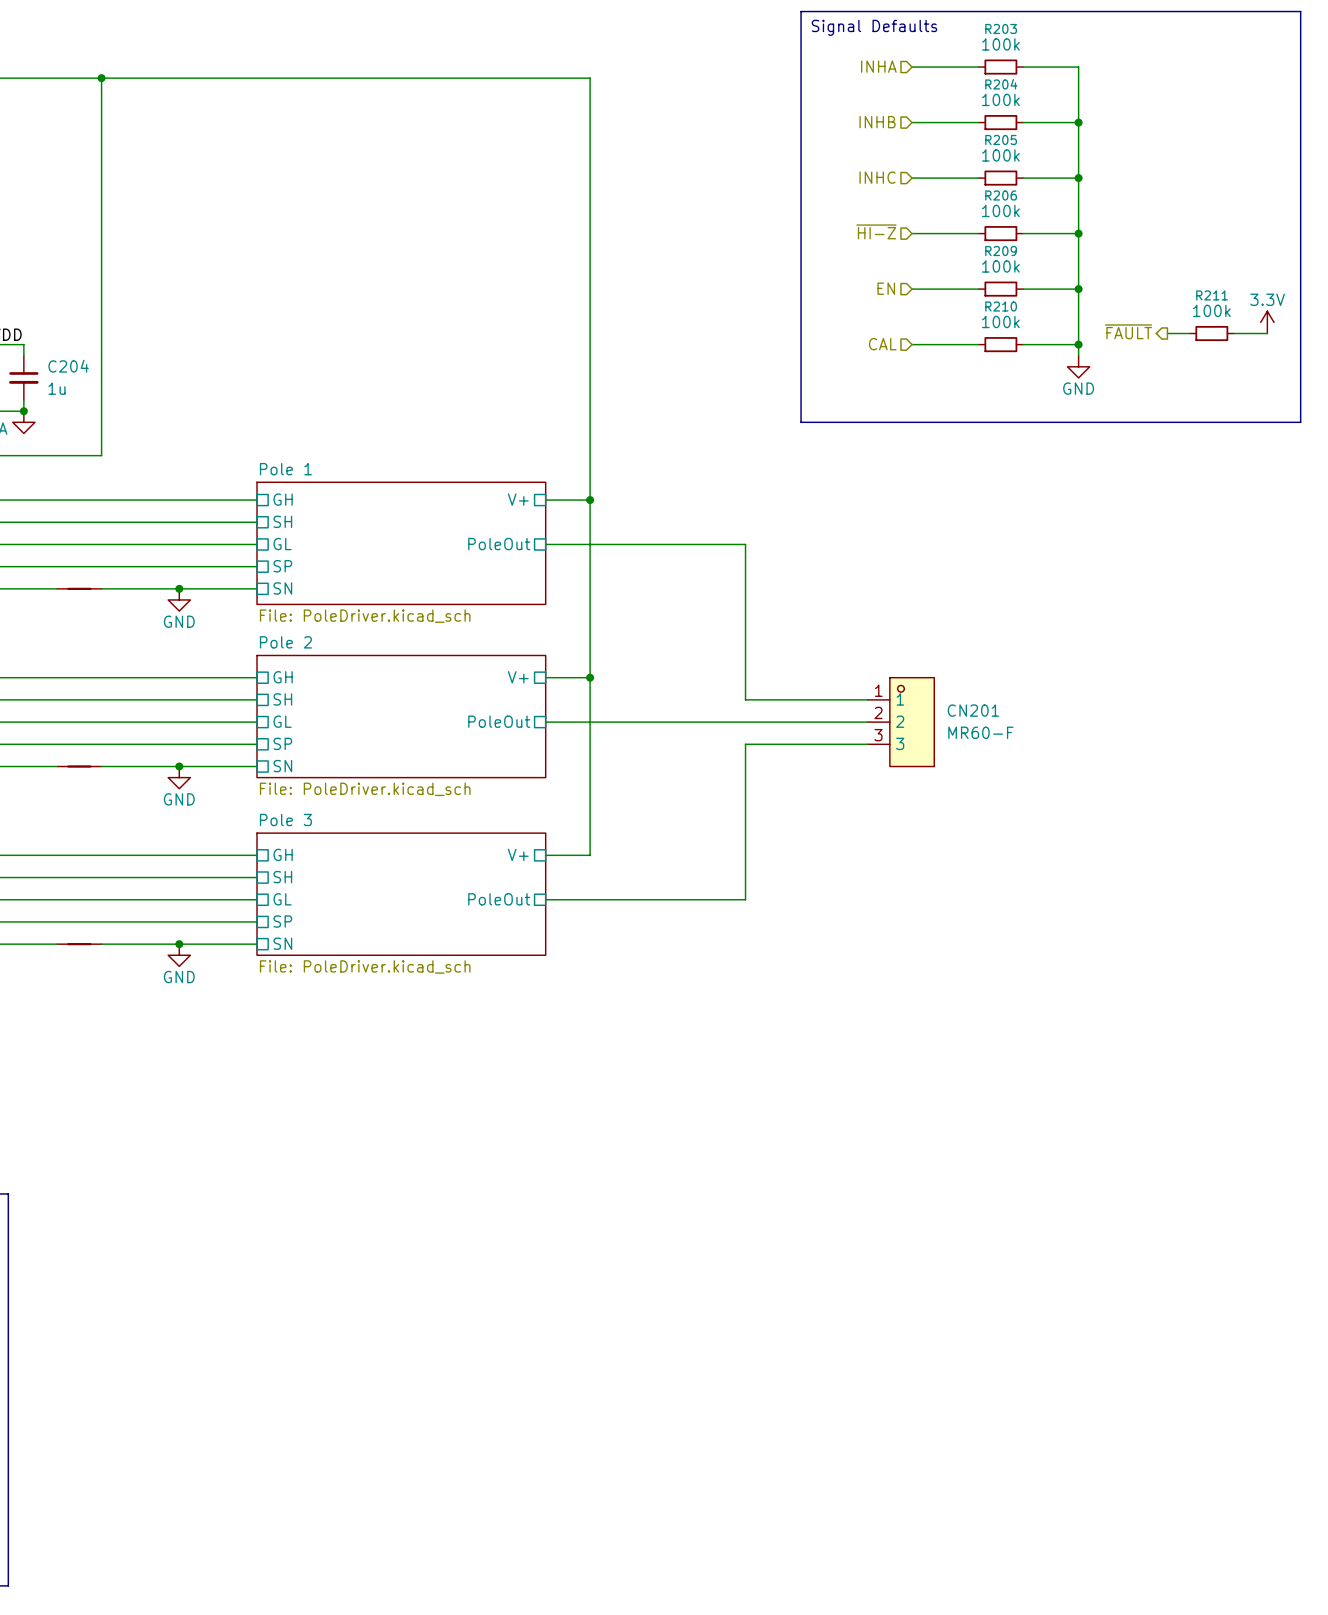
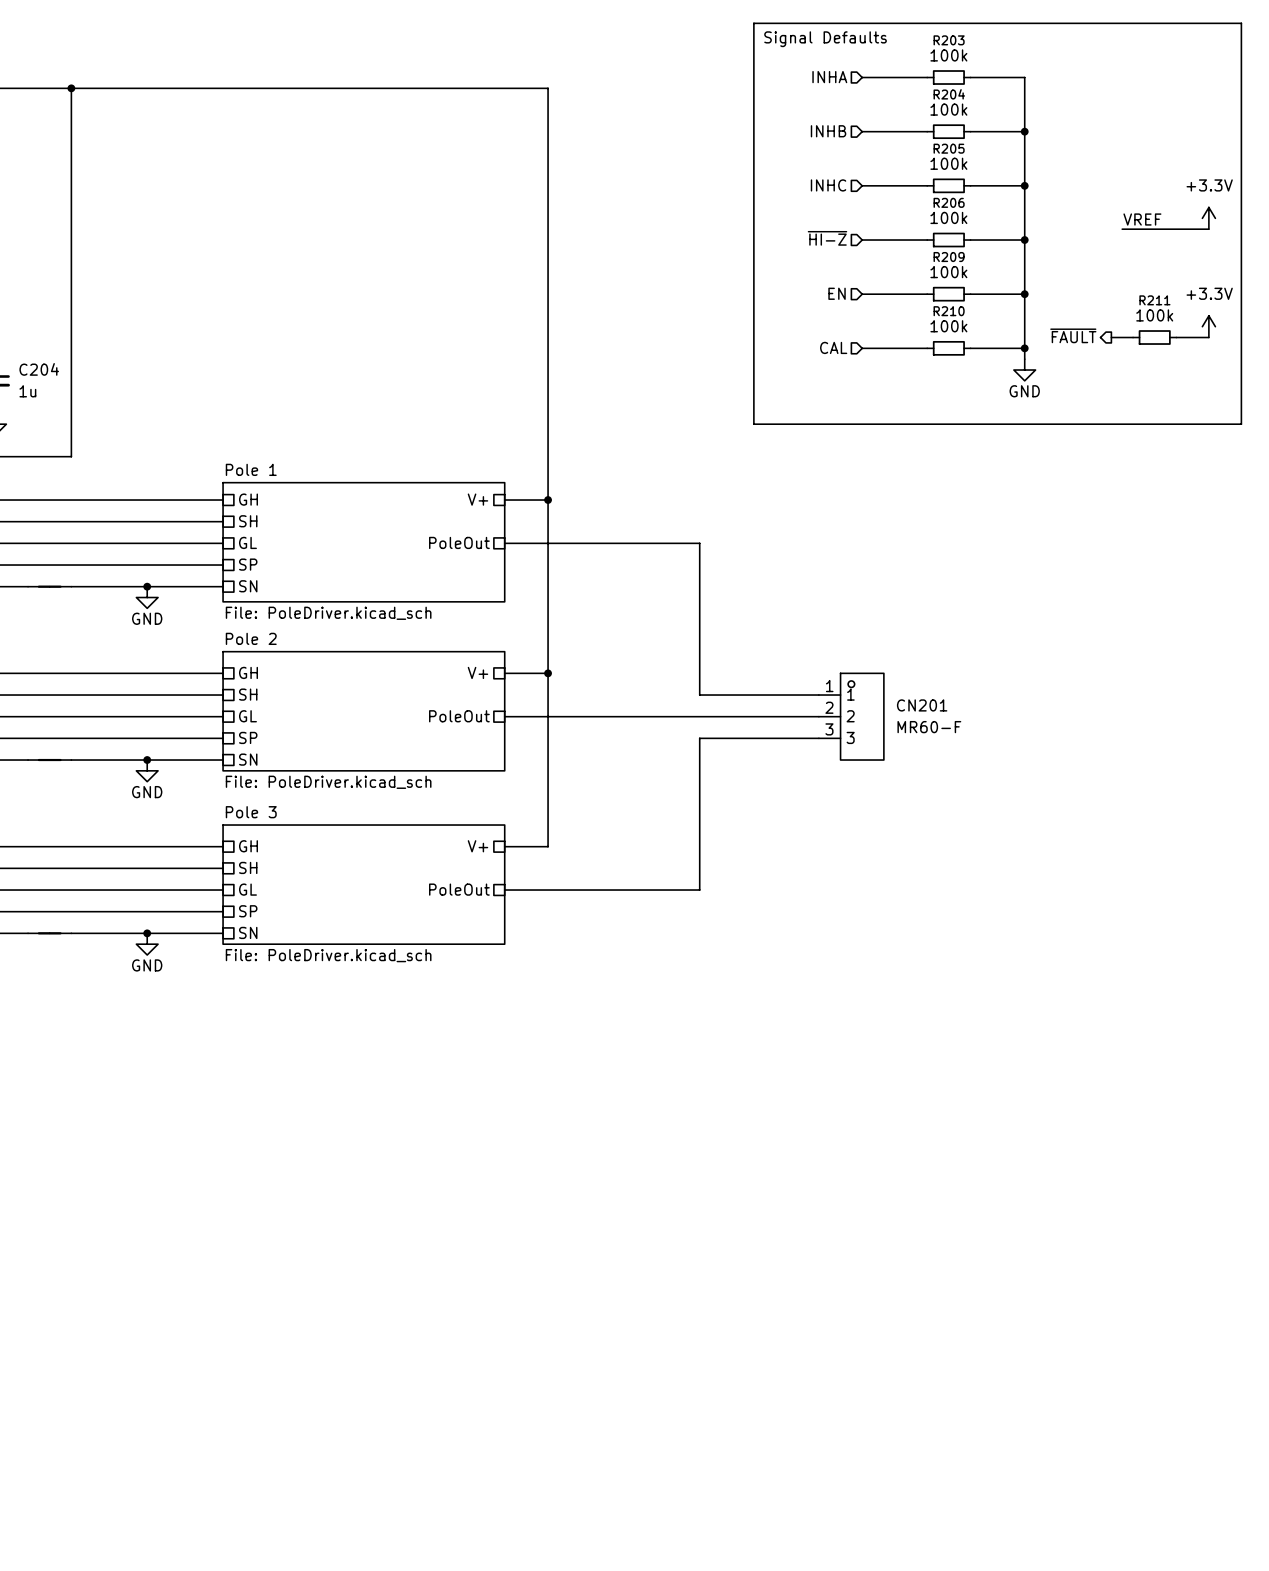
power symbol: none -> +3.3V (1208, 218)
label: none -> VREF (1142, 219)
wire: none -> (1122, 229) (1208, 229)
power symbol: 3.3V (1267, 322) -> +3.3V (1208, 326)

